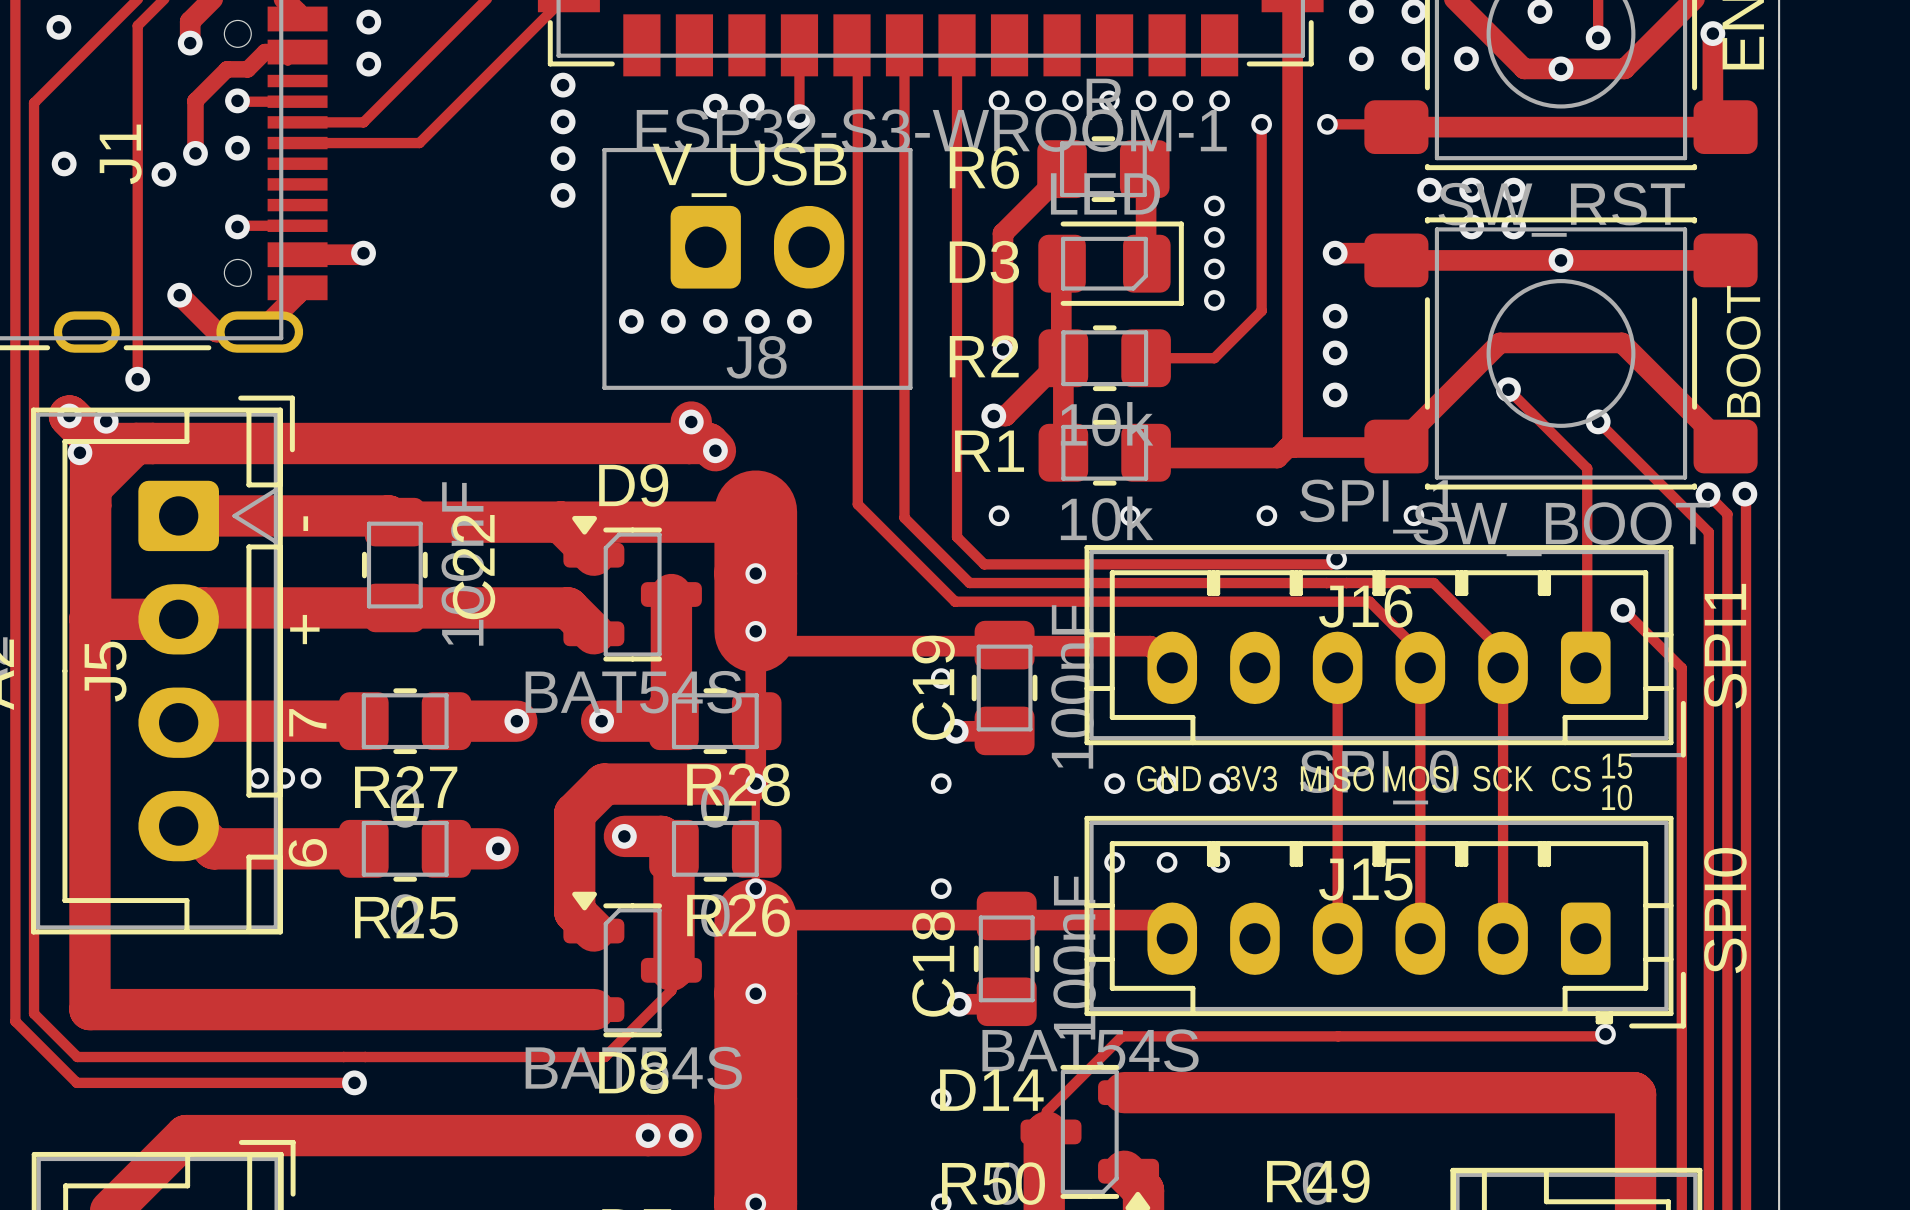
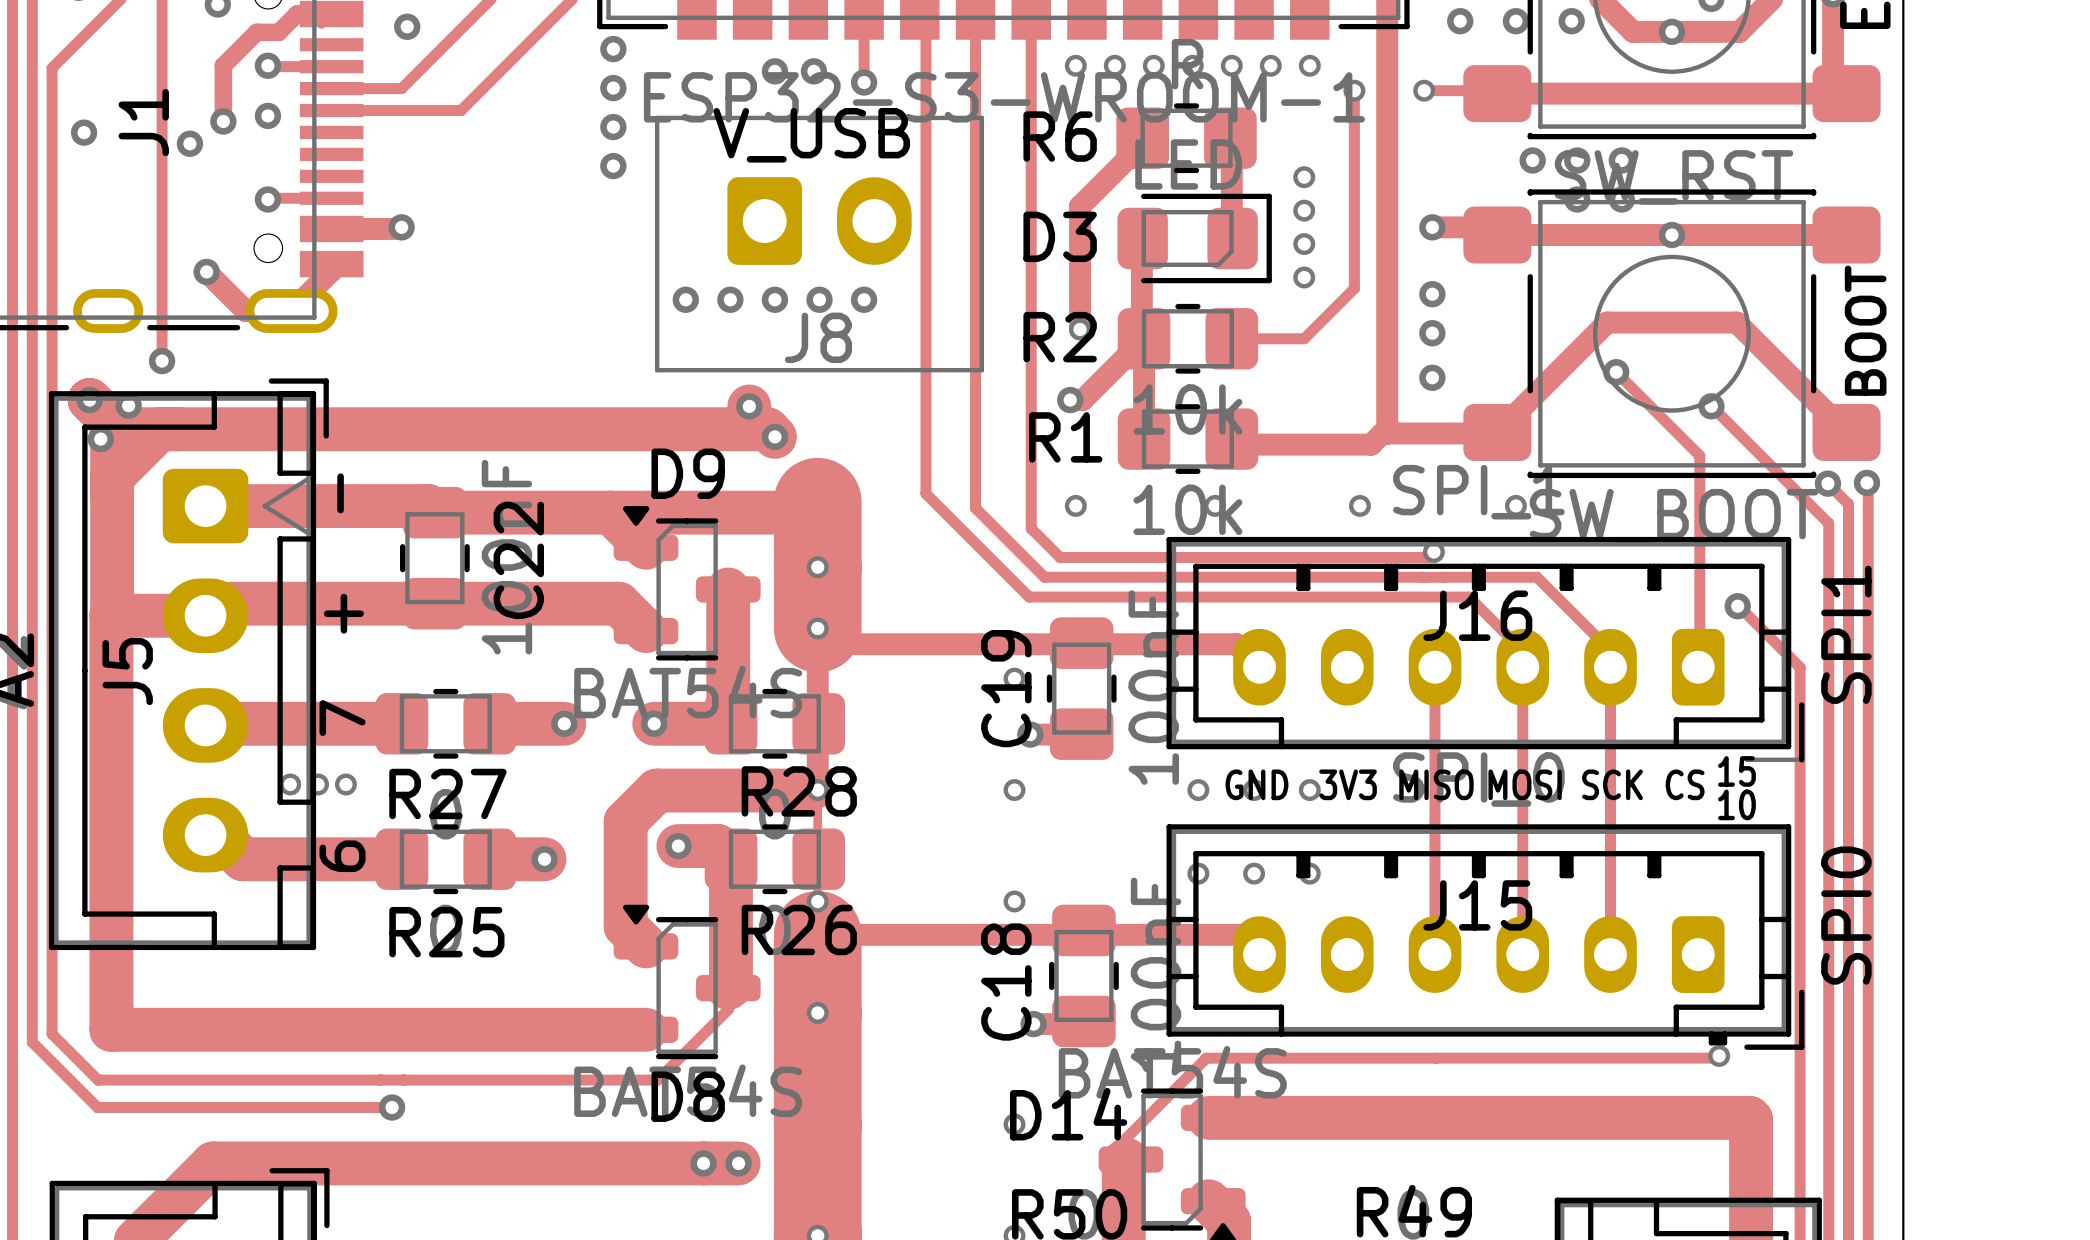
J16 name position: J16 (1365, 606) -> J16 (1477, 615)
J15 name position: J15 (1365, 879) -> J15 (1477, 905)

